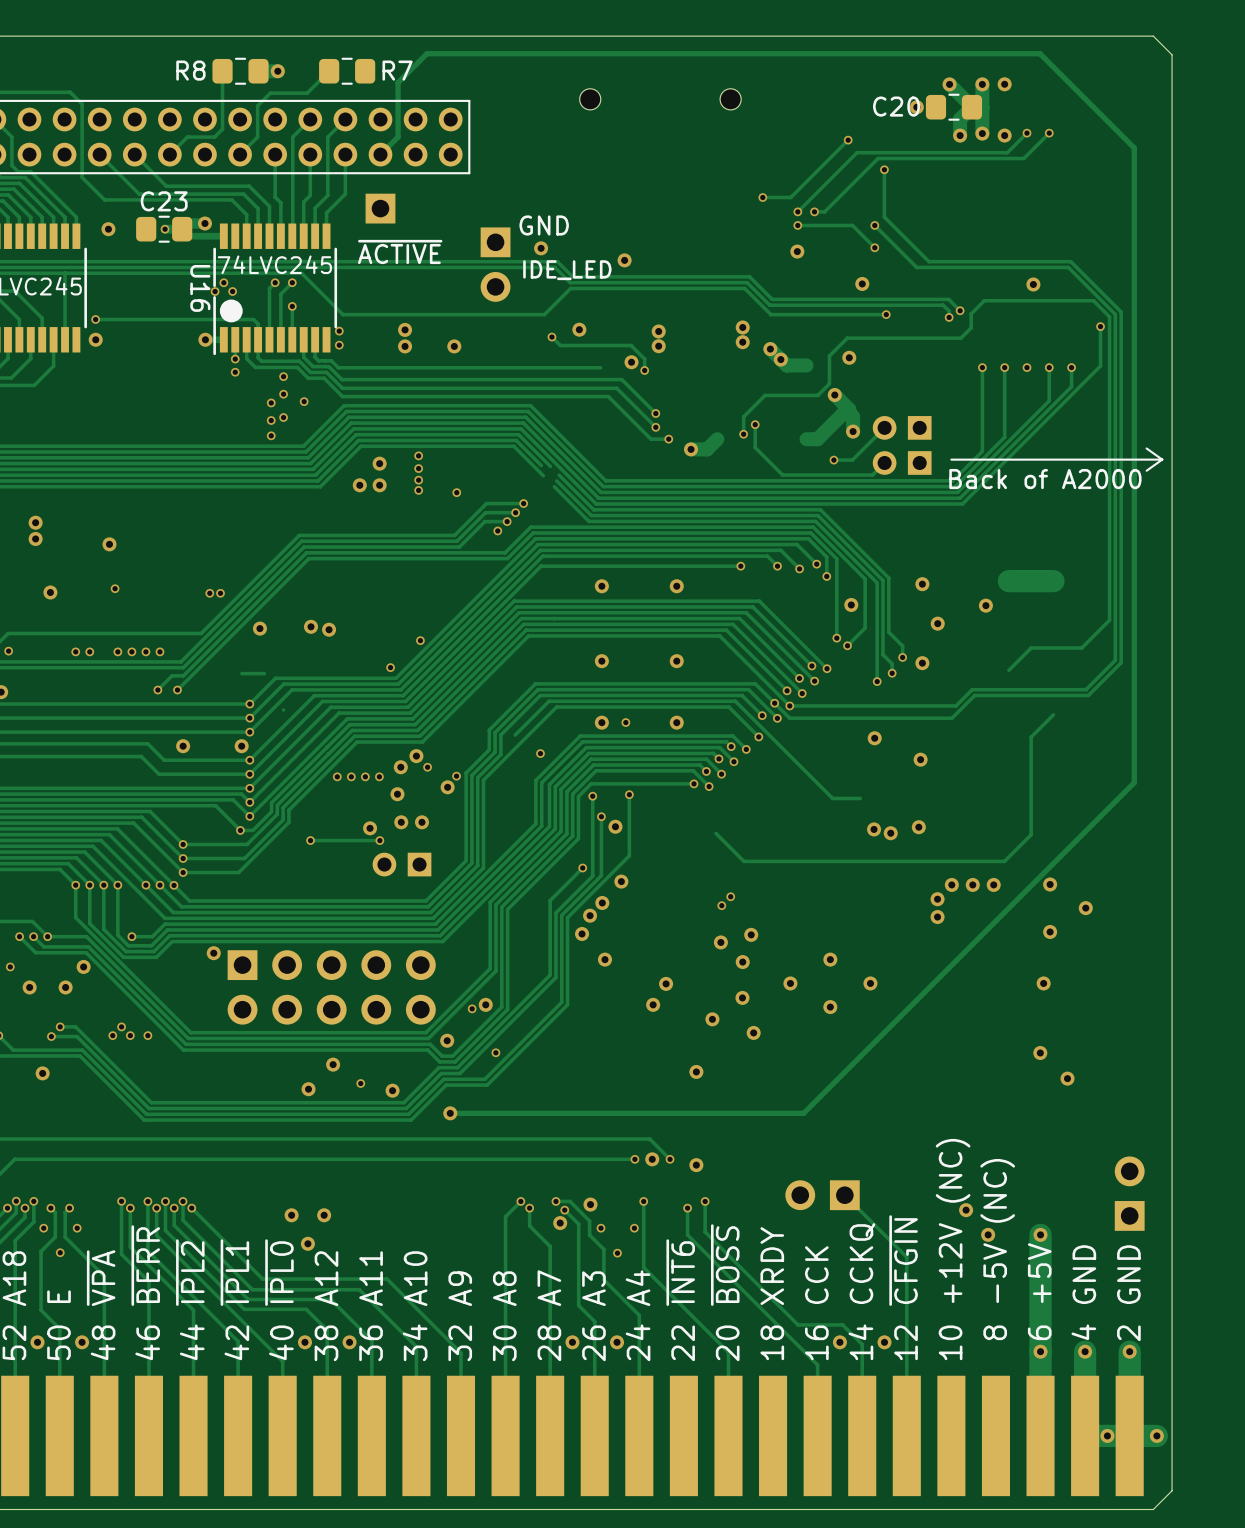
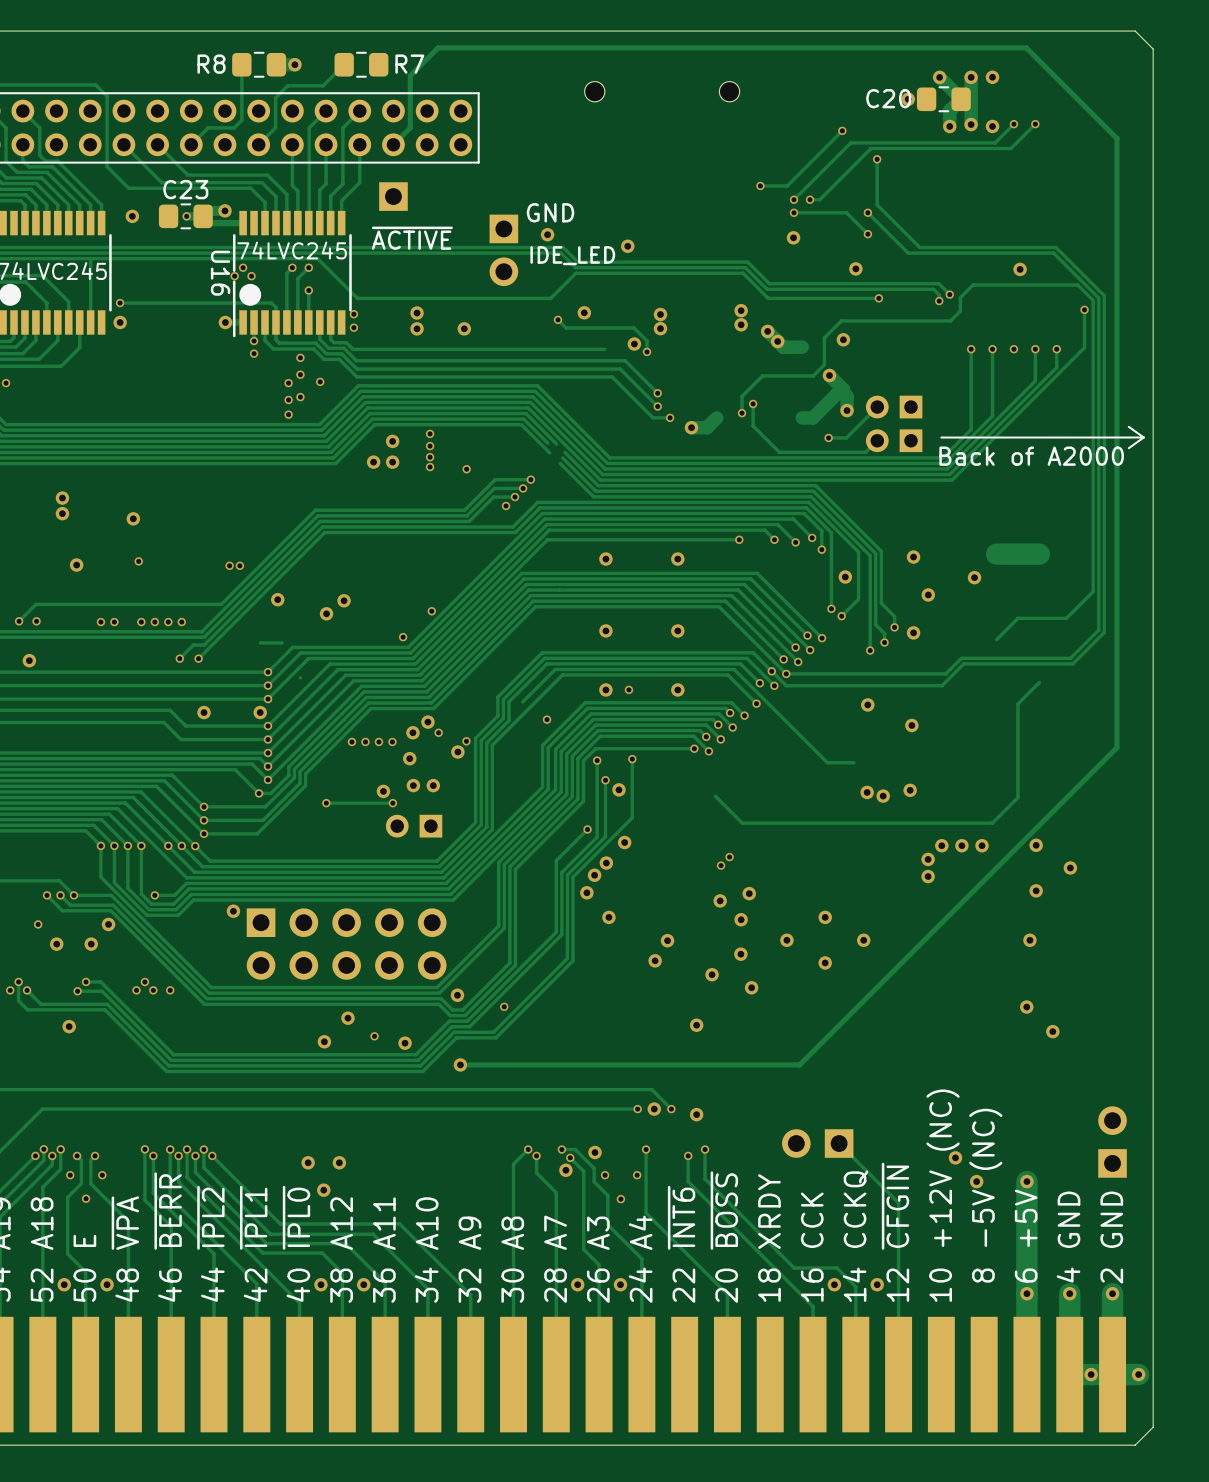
via position: (310, 626) -> (326, 613)
via: (485, 1004) -> none
via: (472, 1008) -> none

